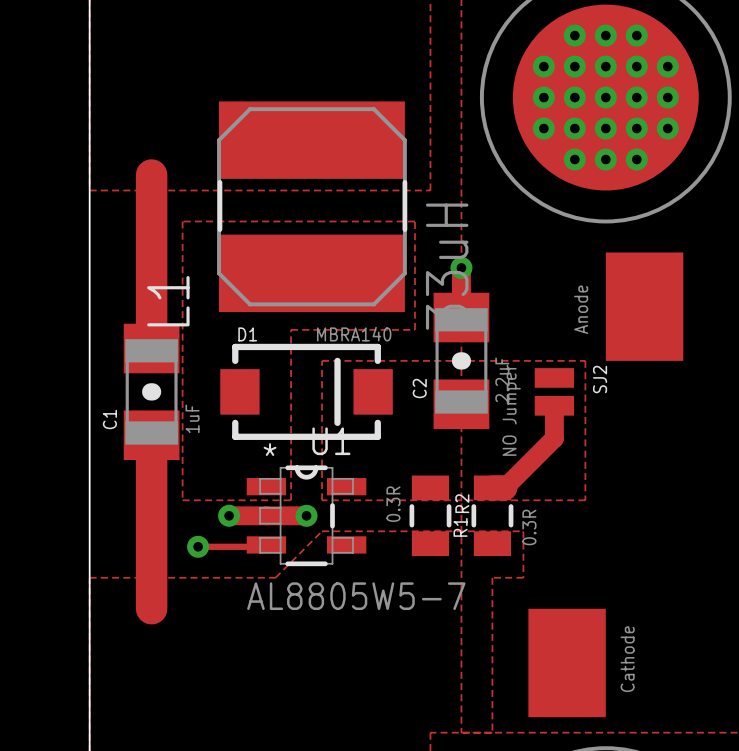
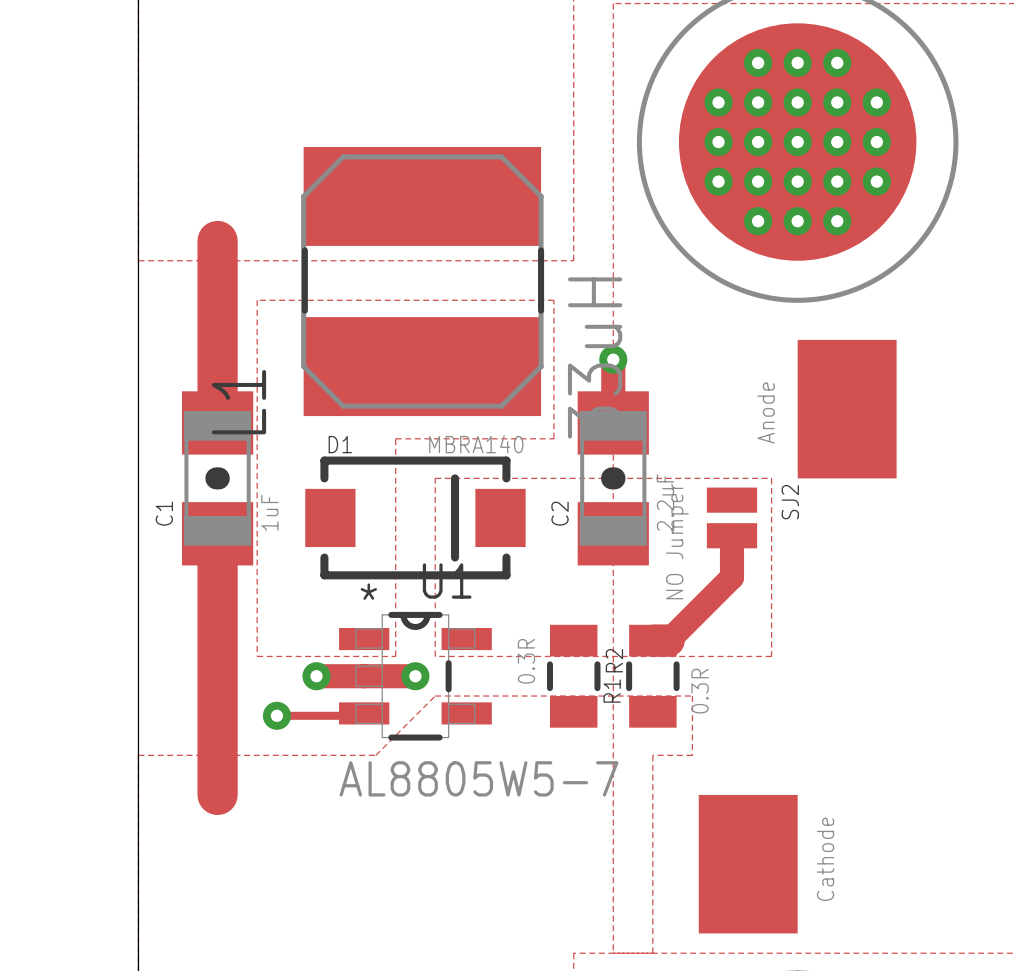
C1 position: (151, 391) -> (217, 478)

